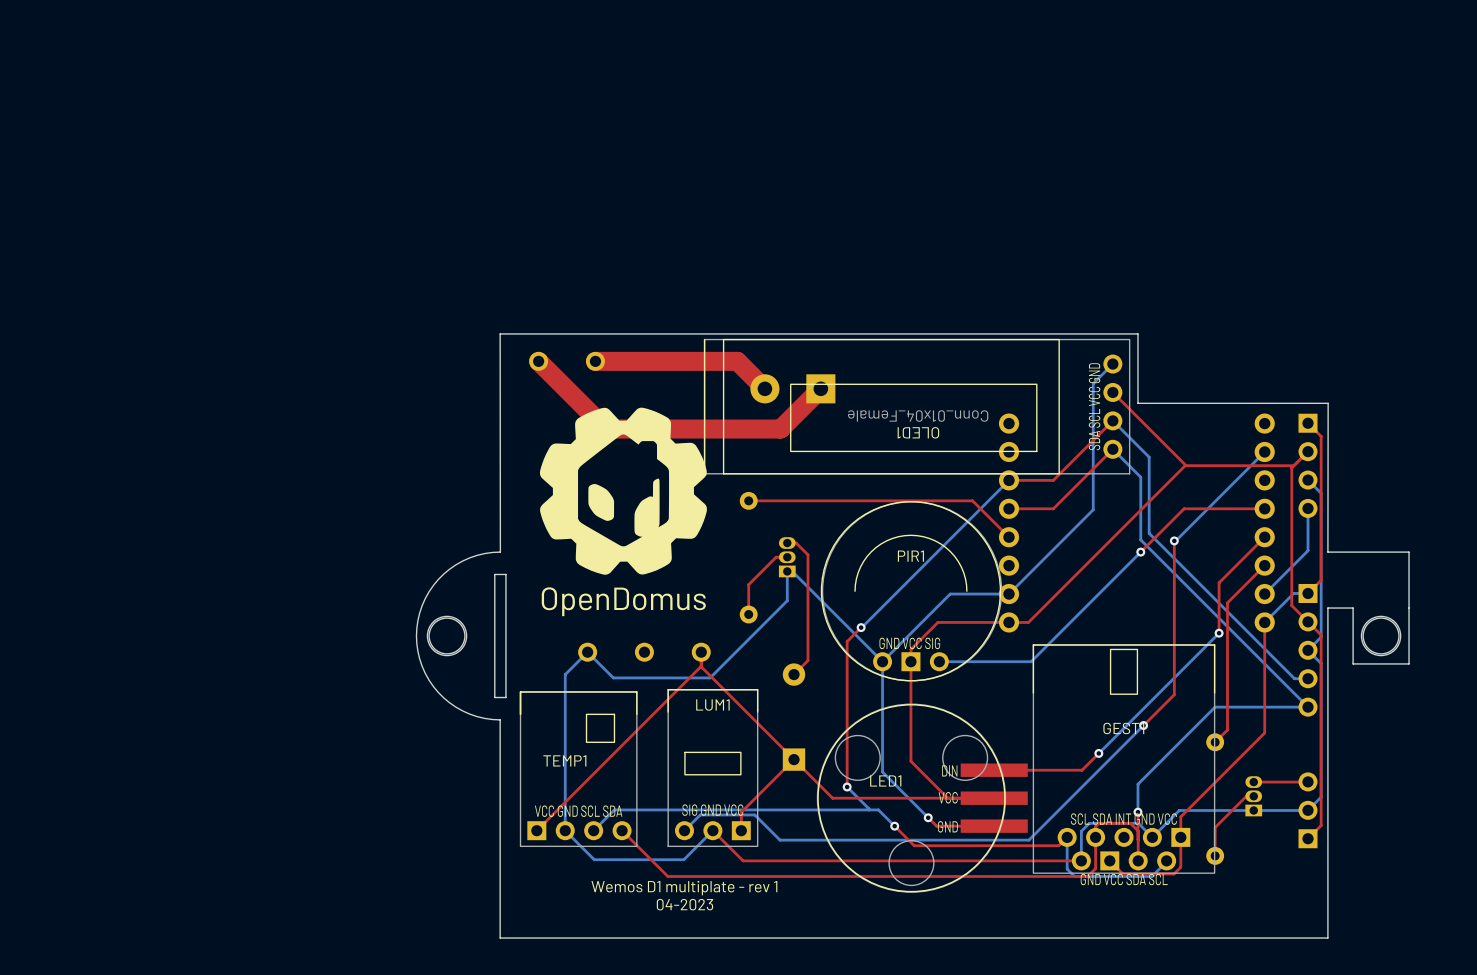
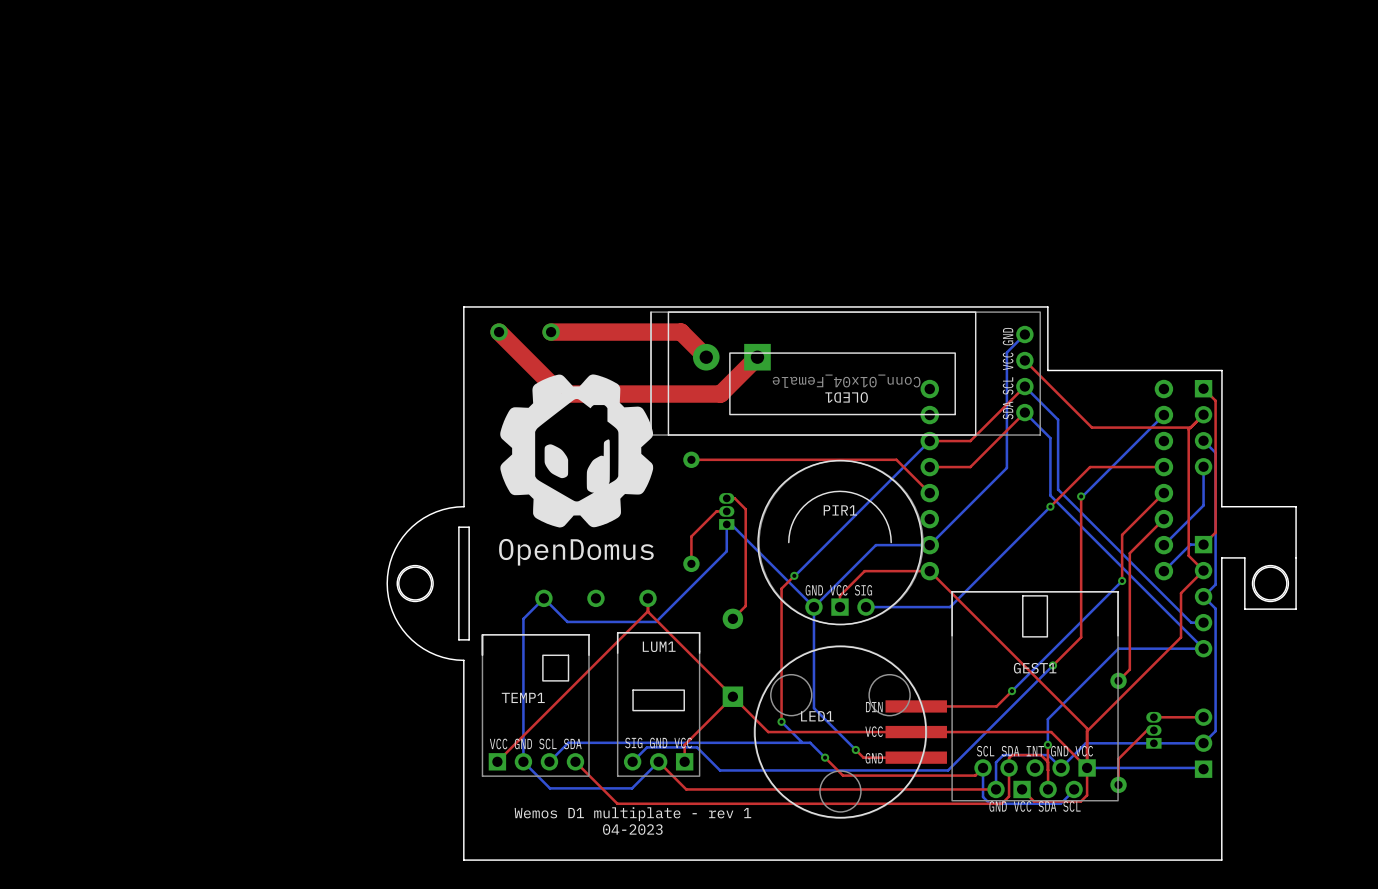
top track: (1185, 465) (1028, 622) (1009, 622) -> none
top track: (1308, 621) (1321, 635) (1321, 825) (1308, 838) -> (1203, 570) (1181, 593) (1181, 637) (1087, 731)
top track: (1264, 622) (1264, 732) (1180, 816) -> (929, 571) (1087, 728) (1087, 749)
top track: (910, 661) (910, 761) (947, 798) -> none
top track: none -> (916, 732) (1051, 732) (1087, 767)
bottom track: none -> (1087, 767) (1202, 767)

